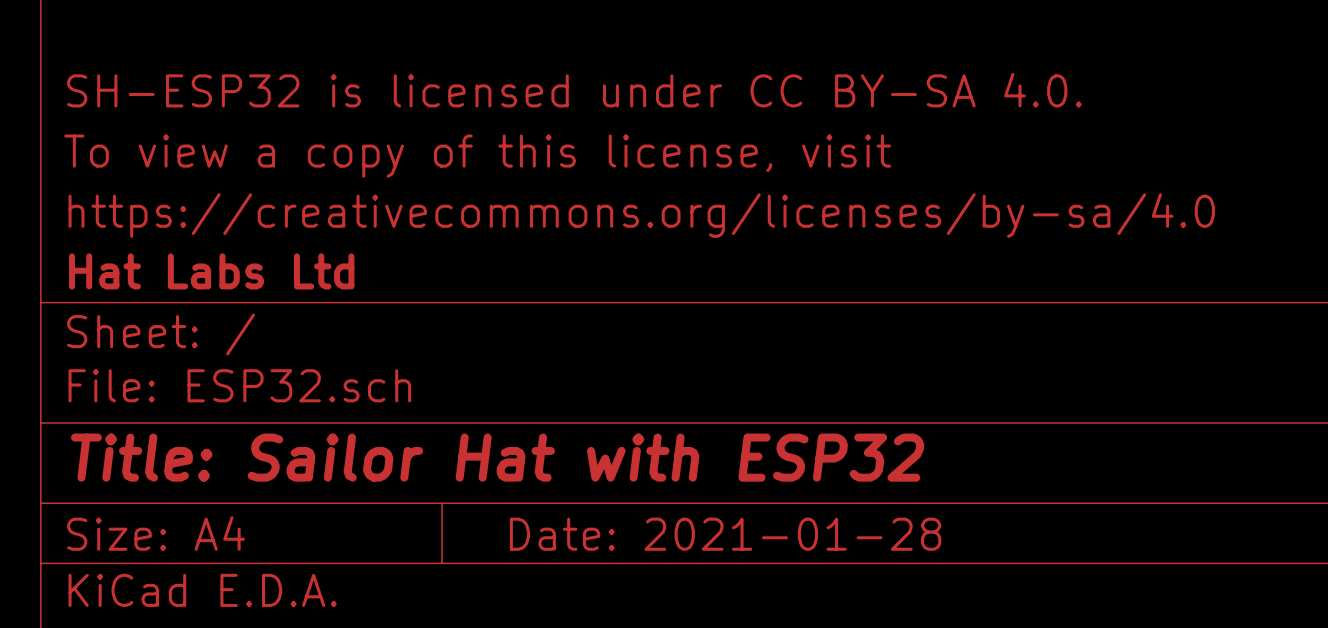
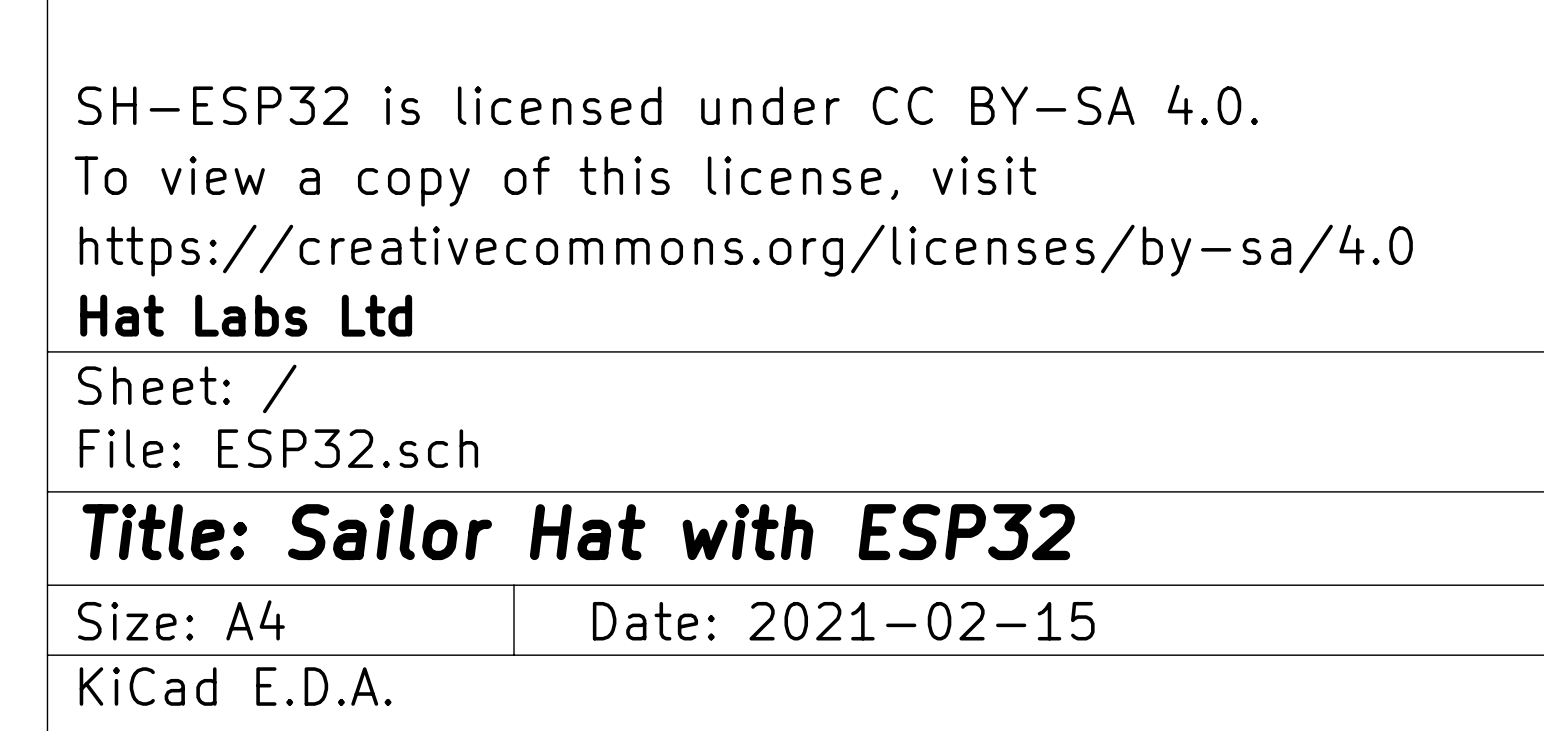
title block: Date: 2021-01-28 (725, 534) -> Date: 2021-02-15 (843, 621)

